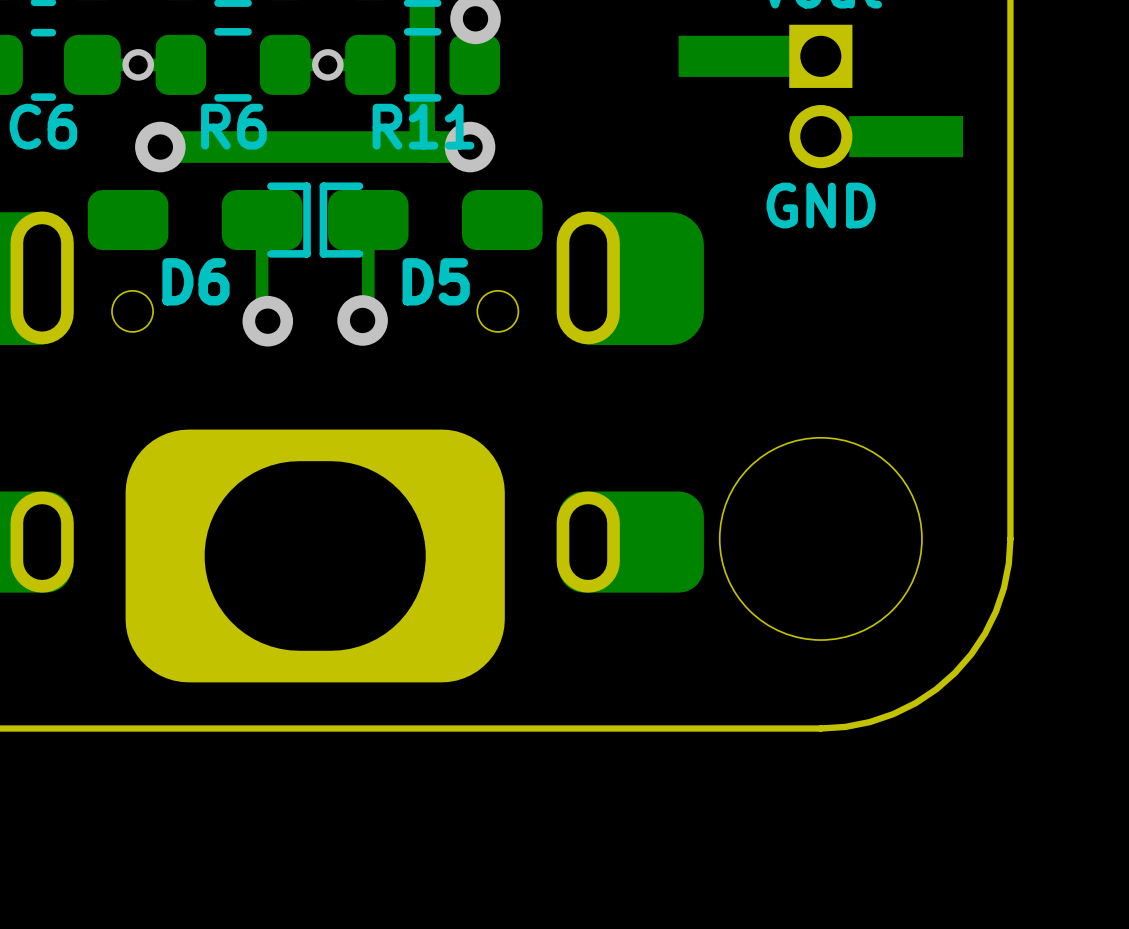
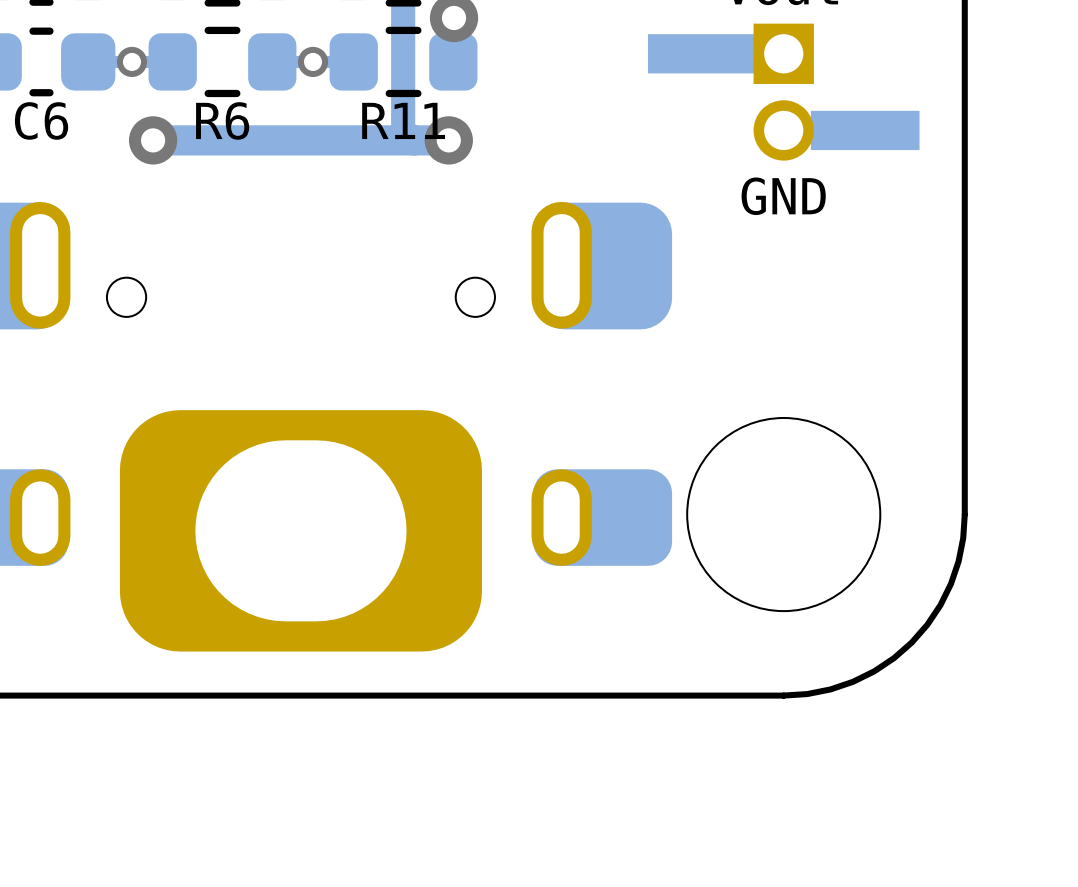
D6: (199, 220) -> none
track: (262, 220) (262, 315) (267, 321) -> none
track: (368, 220) (368, 314) (362, 320) -> none
D5: (431, 220) -> none
via: (362, 320) -> none
via: (267, 321) -> none

